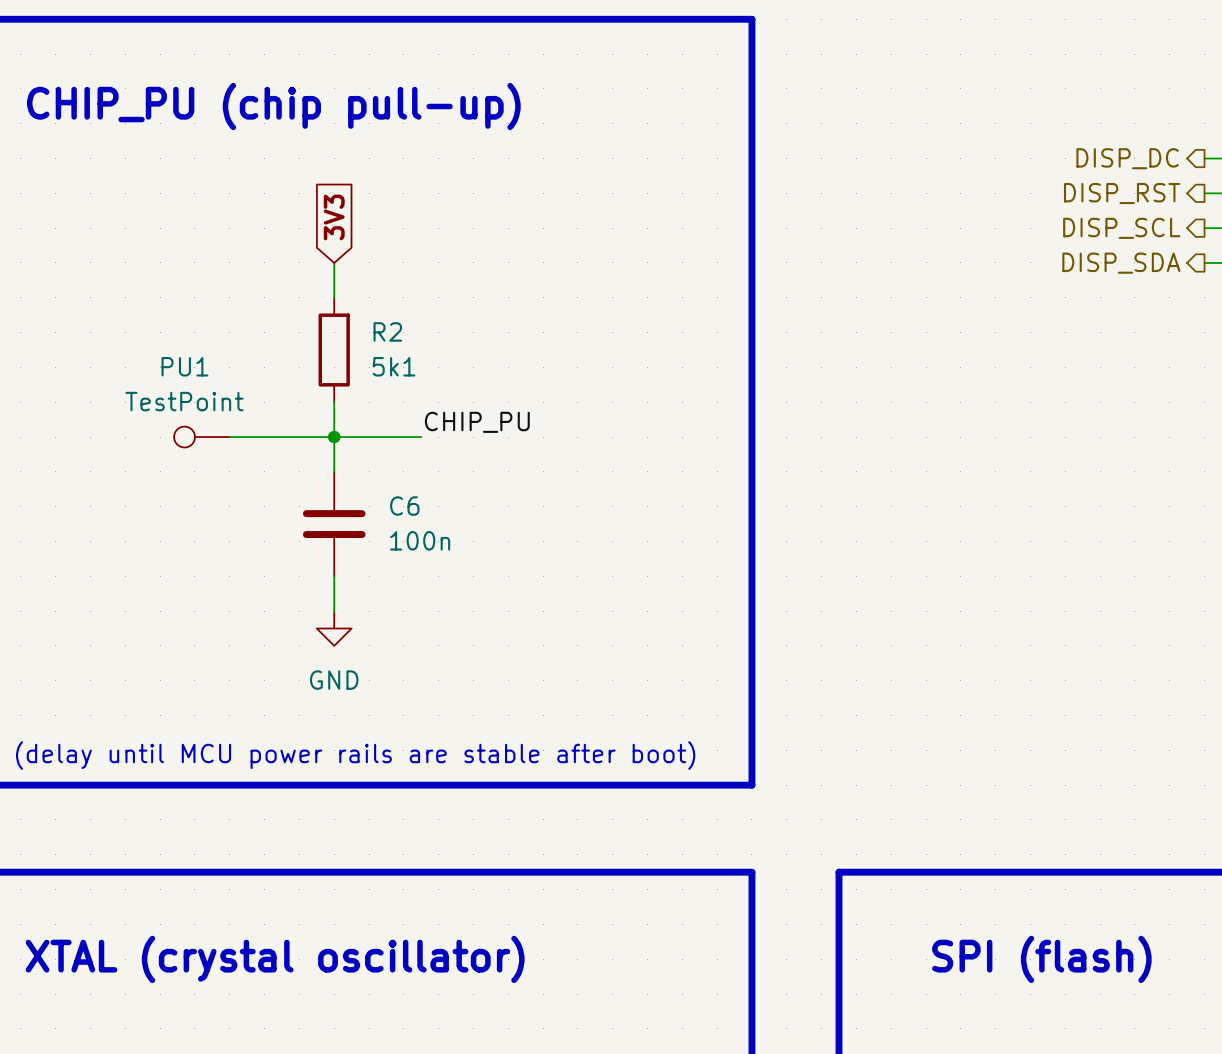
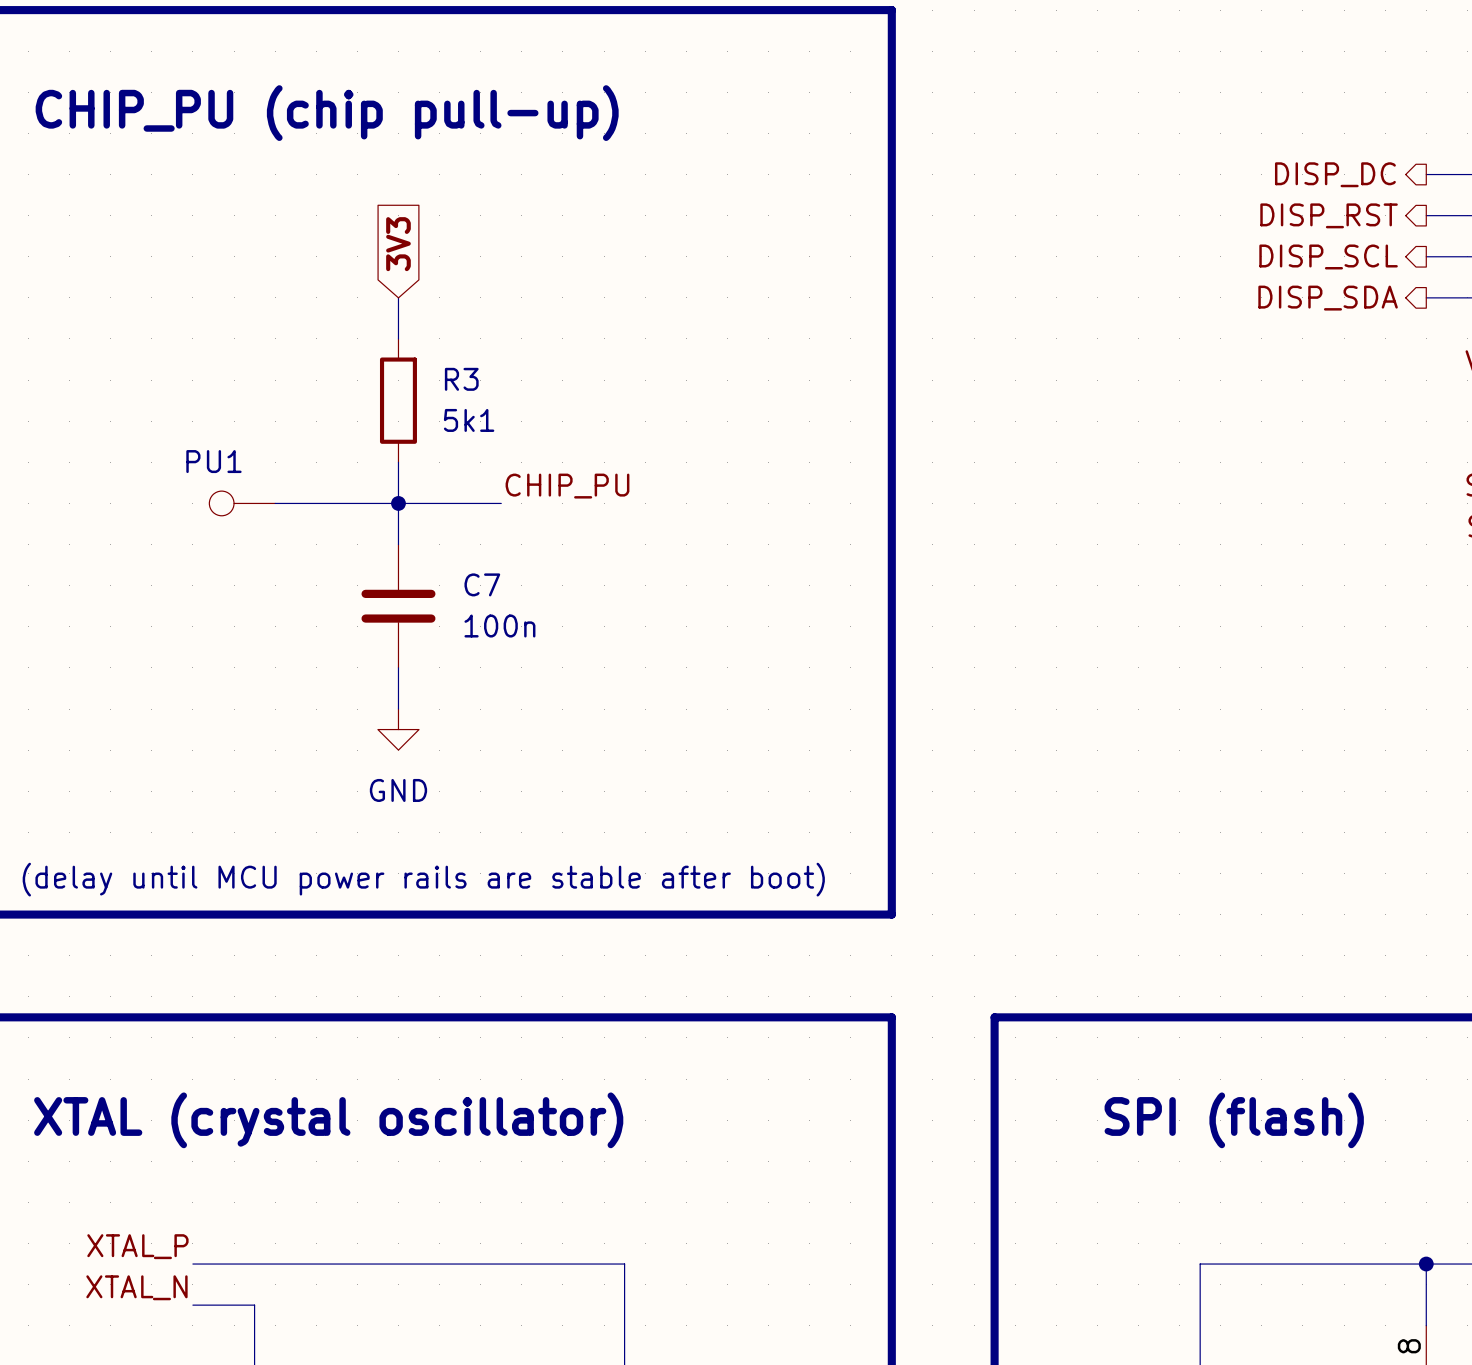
R2 name: R2 (387, 331) -> R3 (461, 379)
PU1 name position: PU1 (184, 366) -> PU1 (213, 461)
PU1 value: TestPoint (184, 401) -> none
C6 name: C6 (404, 506) -> C7 (482, 584)

